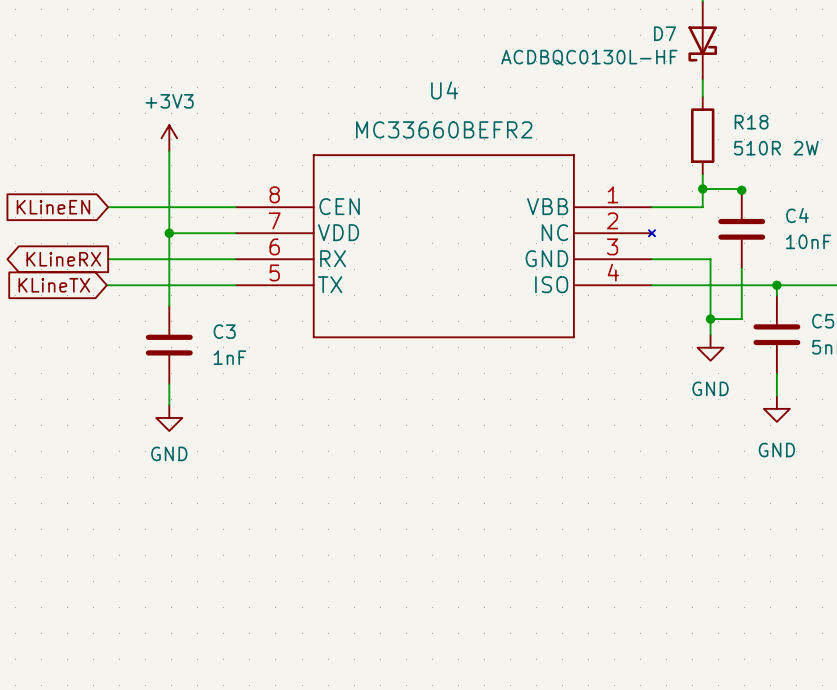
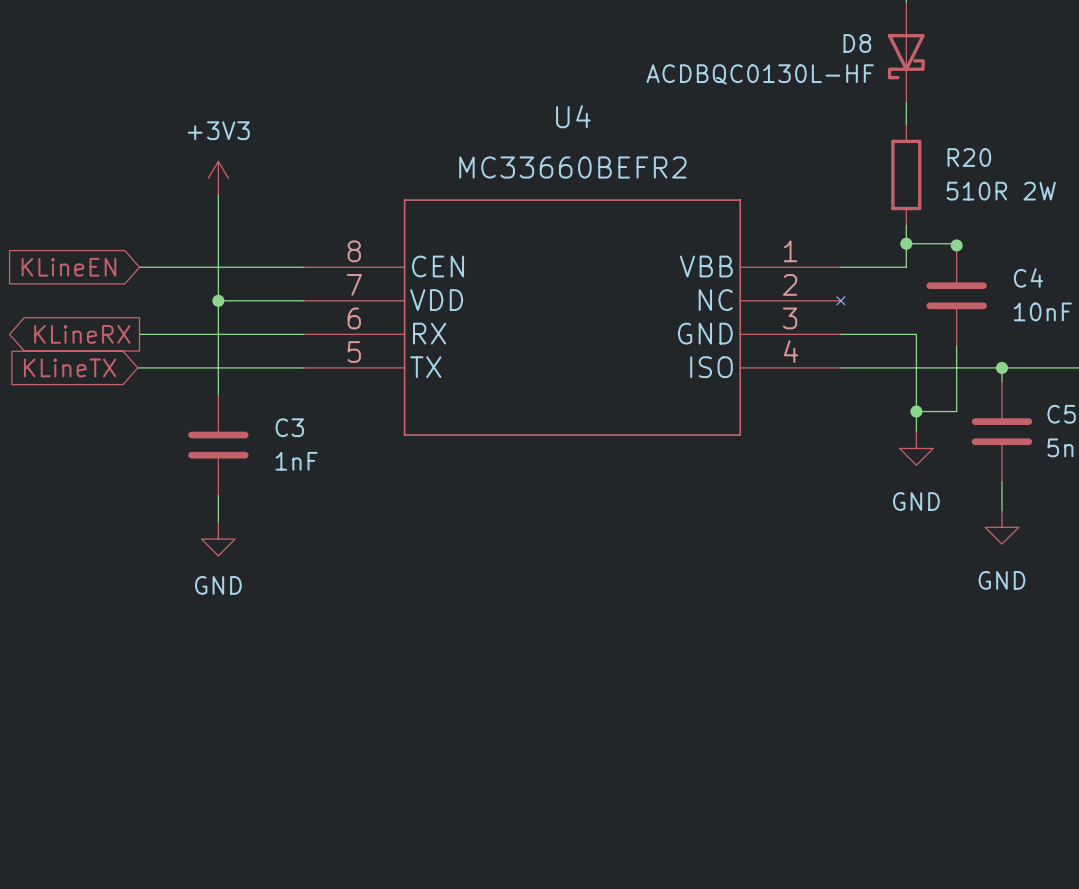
D7 name: D7 (665, 33) -> D8 (857, 43)
R18 name: R18 (751, 122) -> R20 (969, 157)

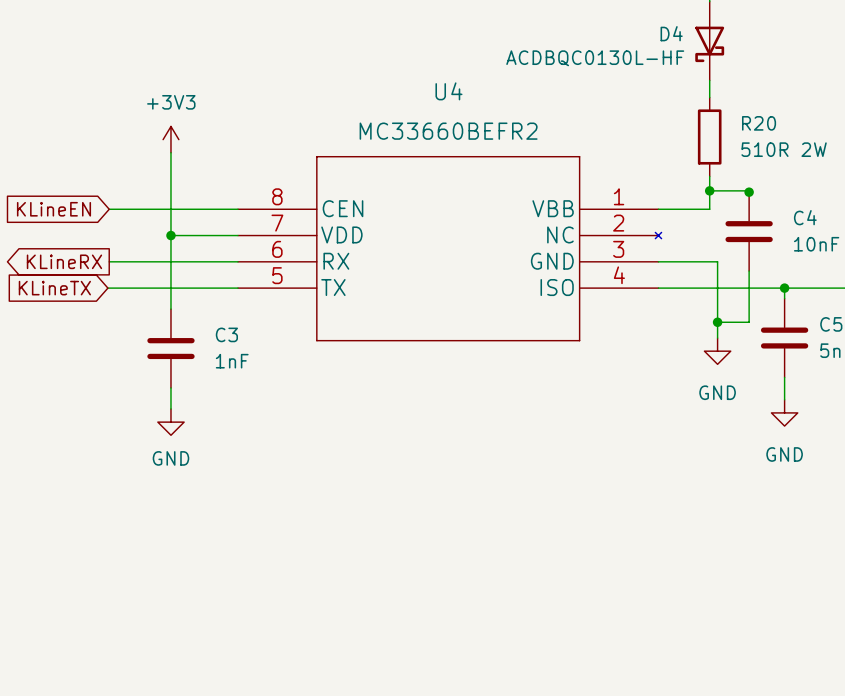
D8 name: D8 (857, 43) -> D4 (671, 33)

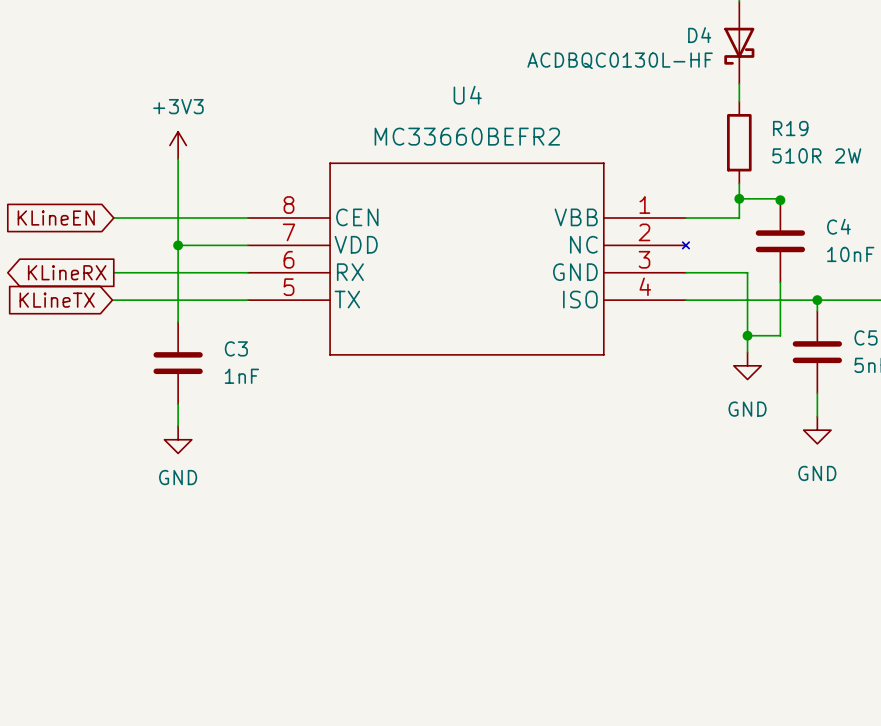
R20 name: R20 (759, 123) -> R19 (790, 128)

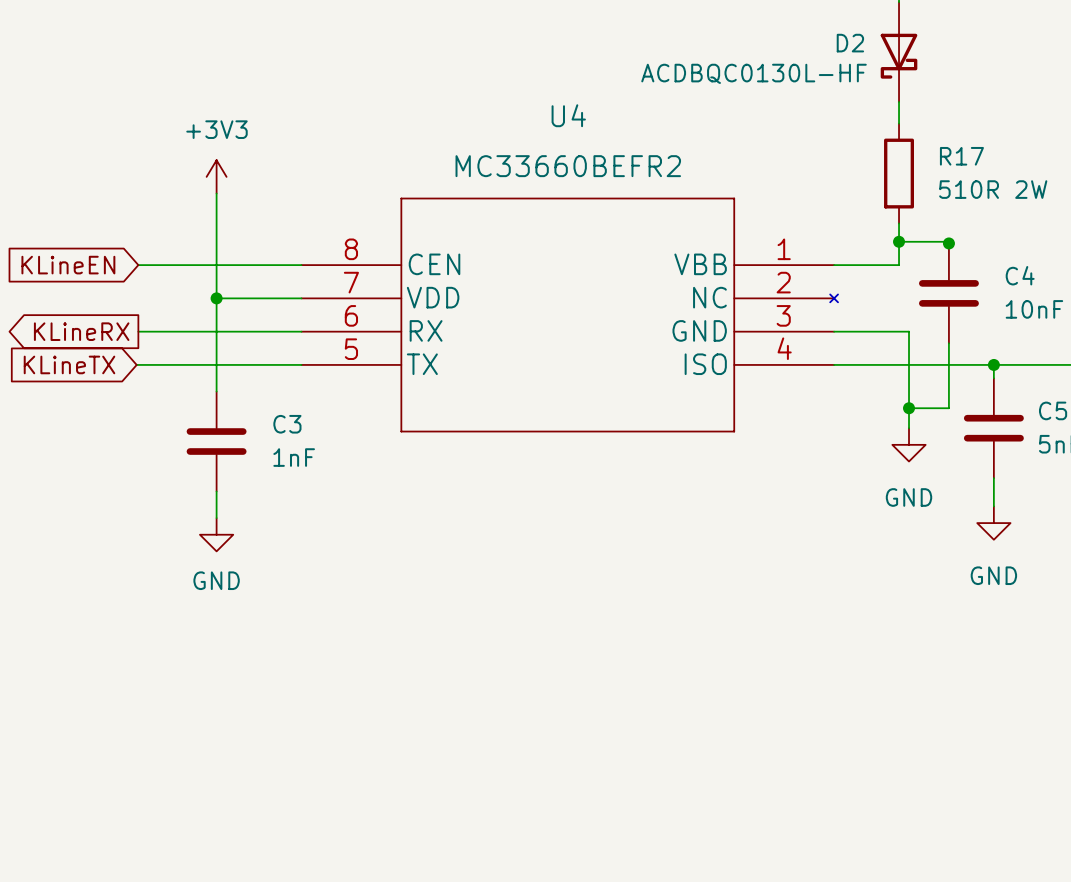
D4 name: D4 (699, 35) -> D2 (850, 43)
R19 name: R19 (790, 128) -> R17 (961, 156)

